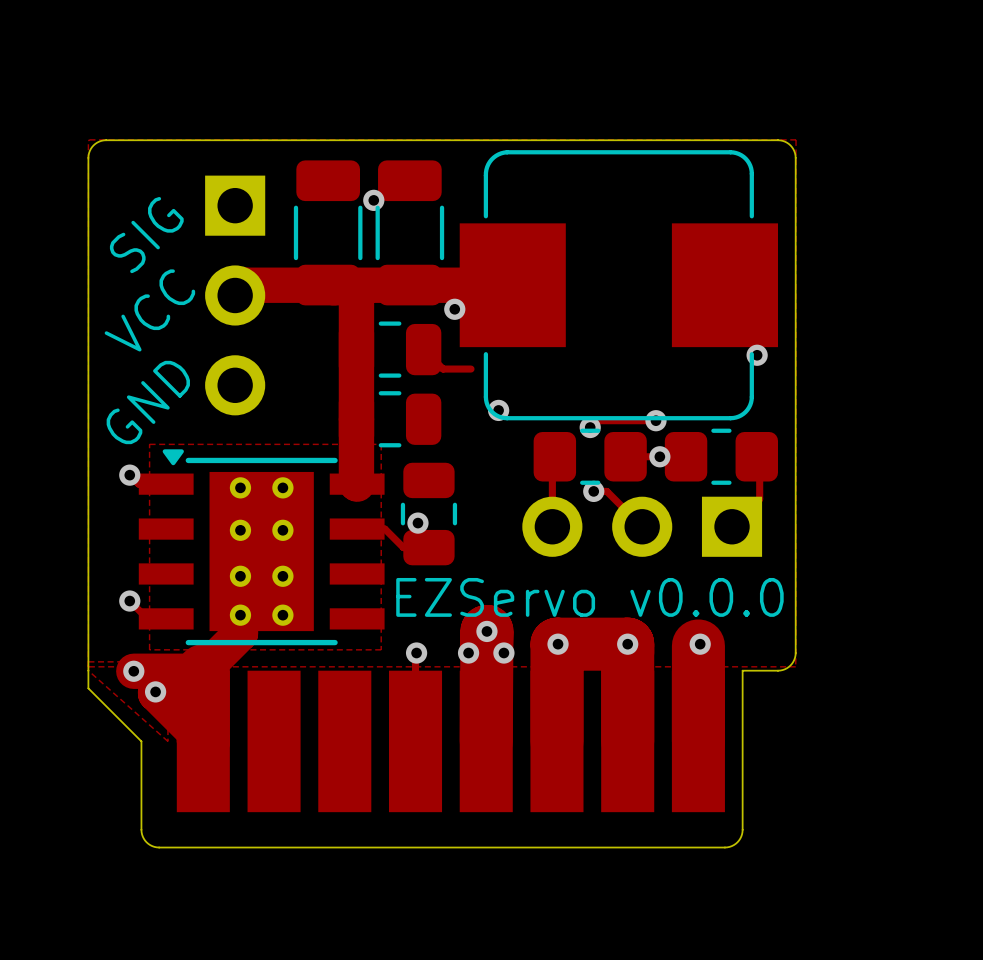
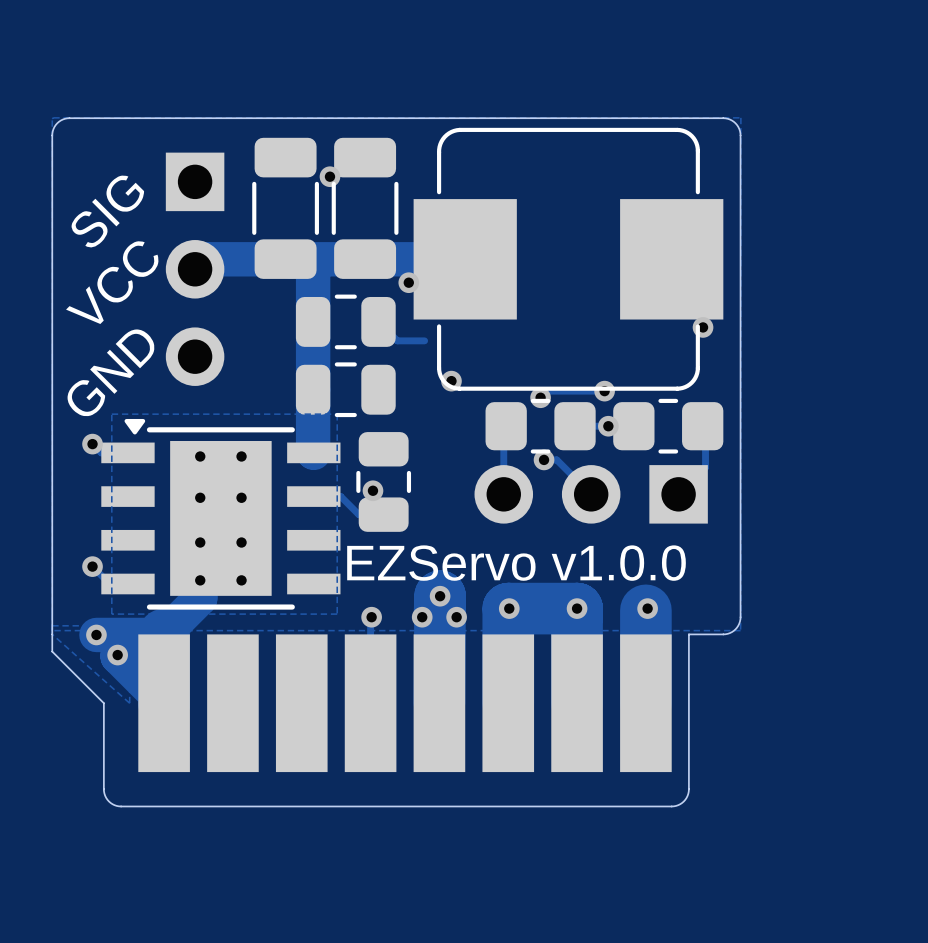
text: EZServo v0.0.0 (589, 597) -> EZServo v1.0.0 (516, 563)

